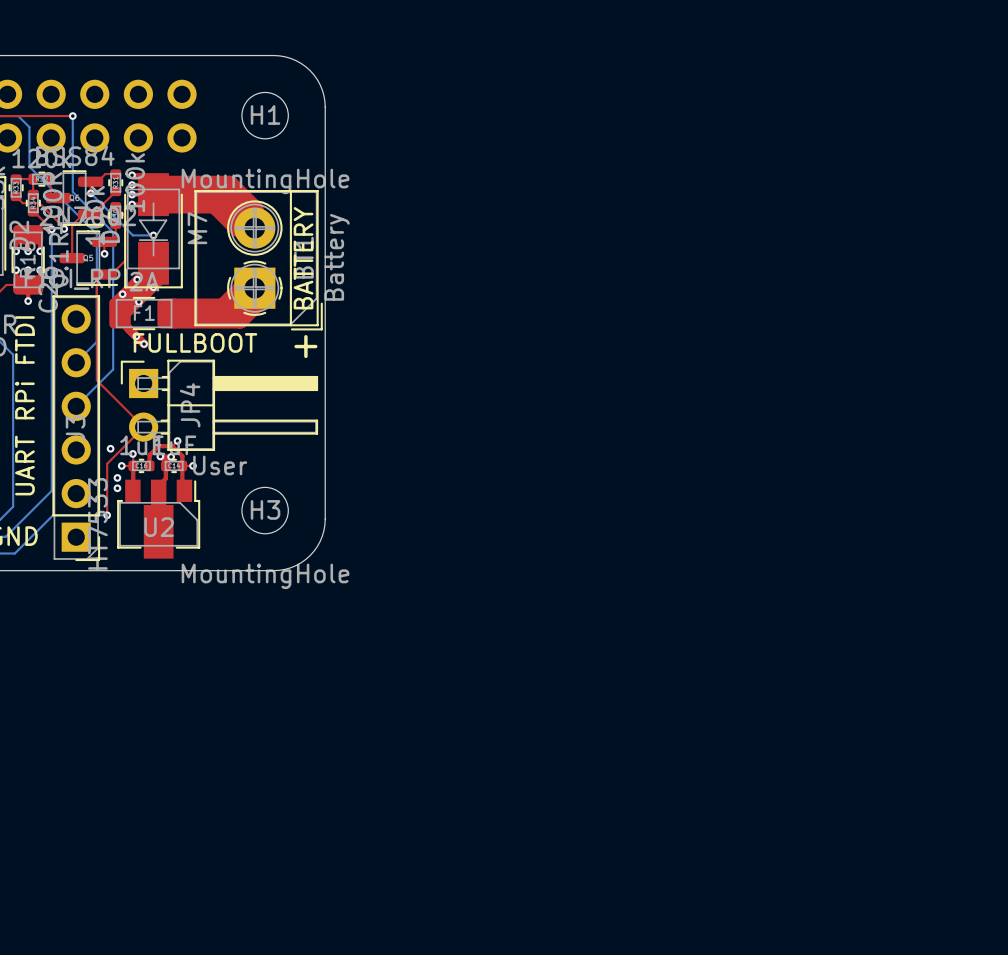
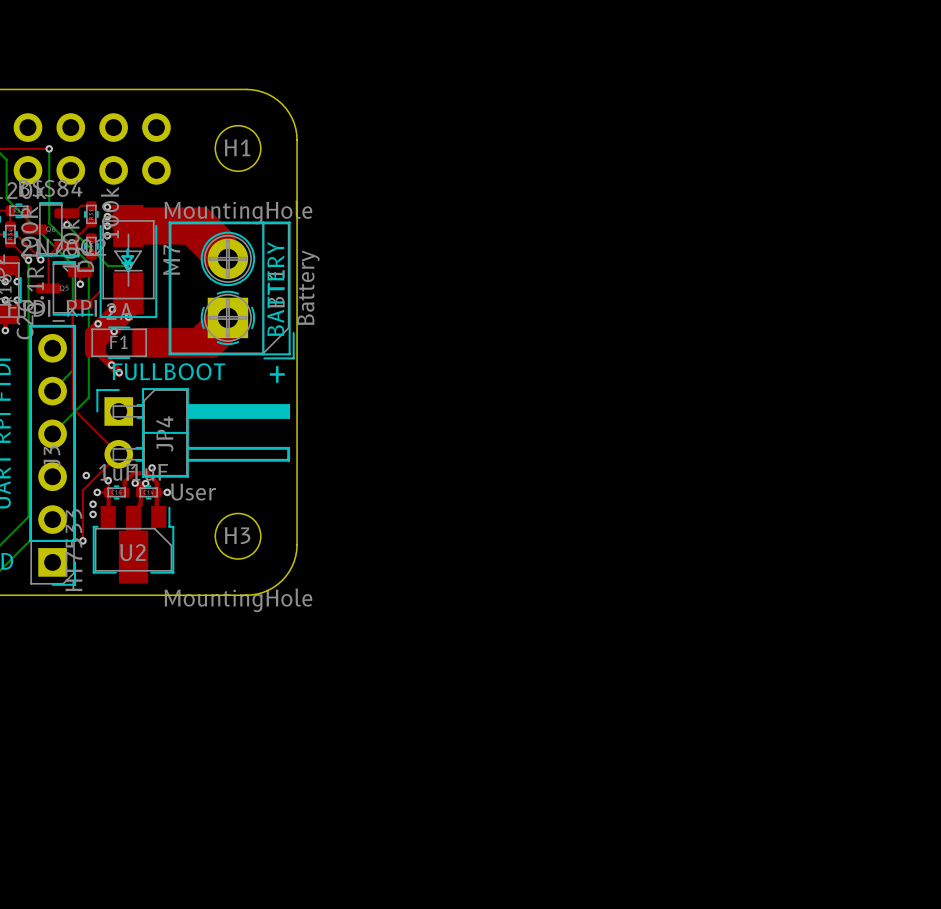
line: none -> (127, 249) (127, 256)
line: none -> (122, 263) (132, 263)
line: none -> (127, 263) (122, 256) (132, 256) (127, 263)
line: none -> (127, 263) (127, 269)

